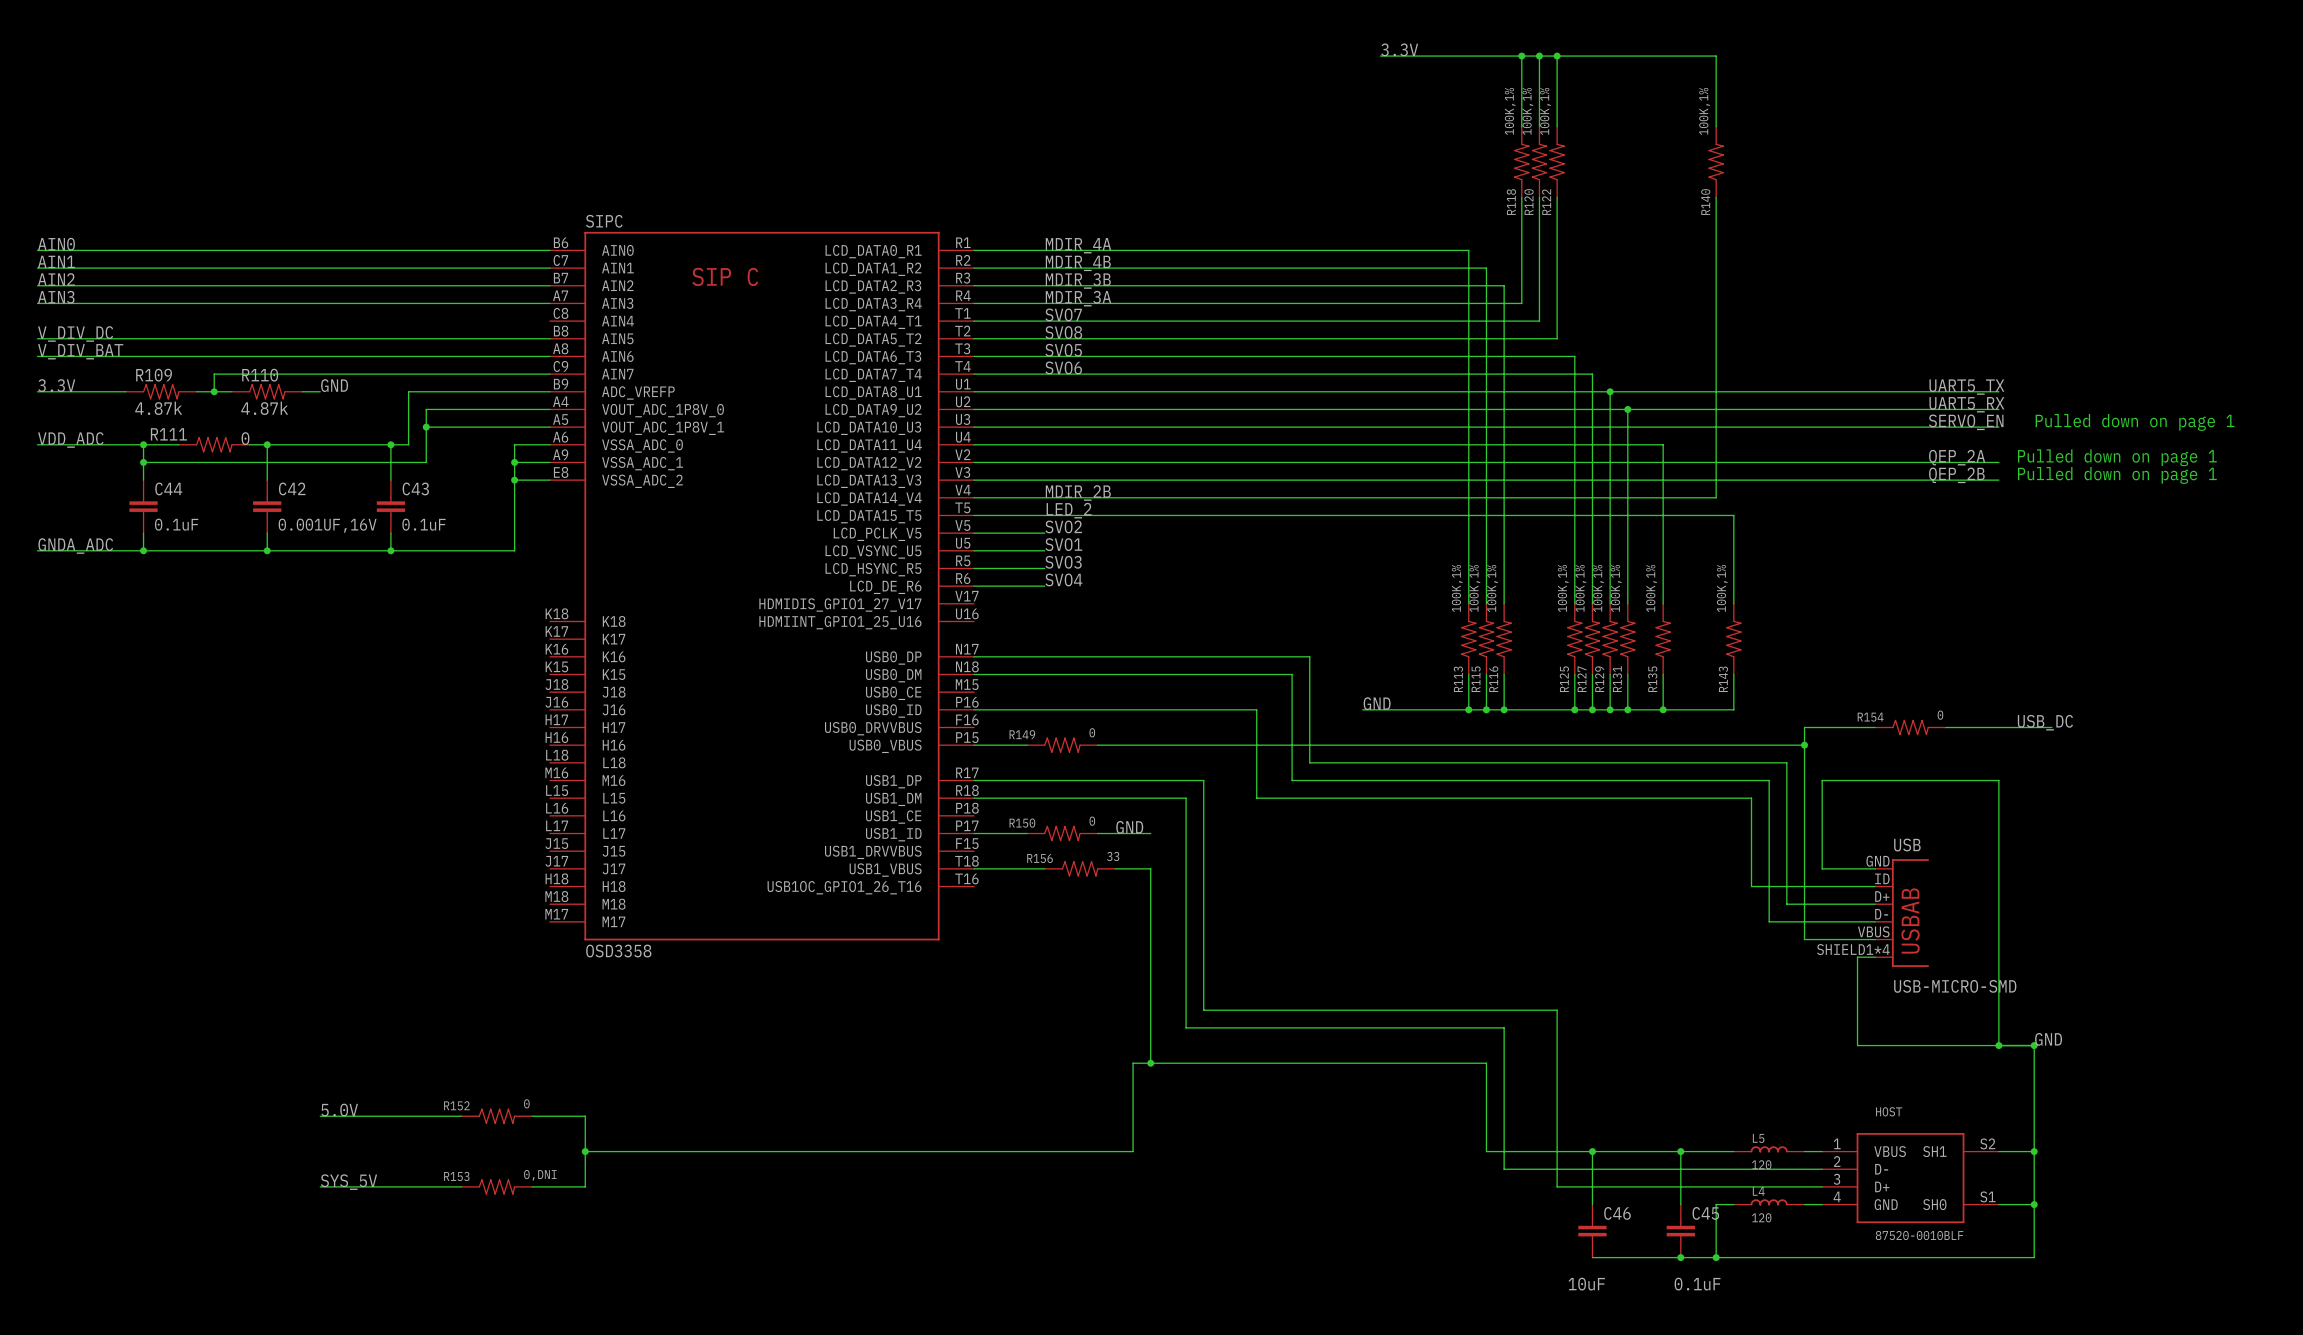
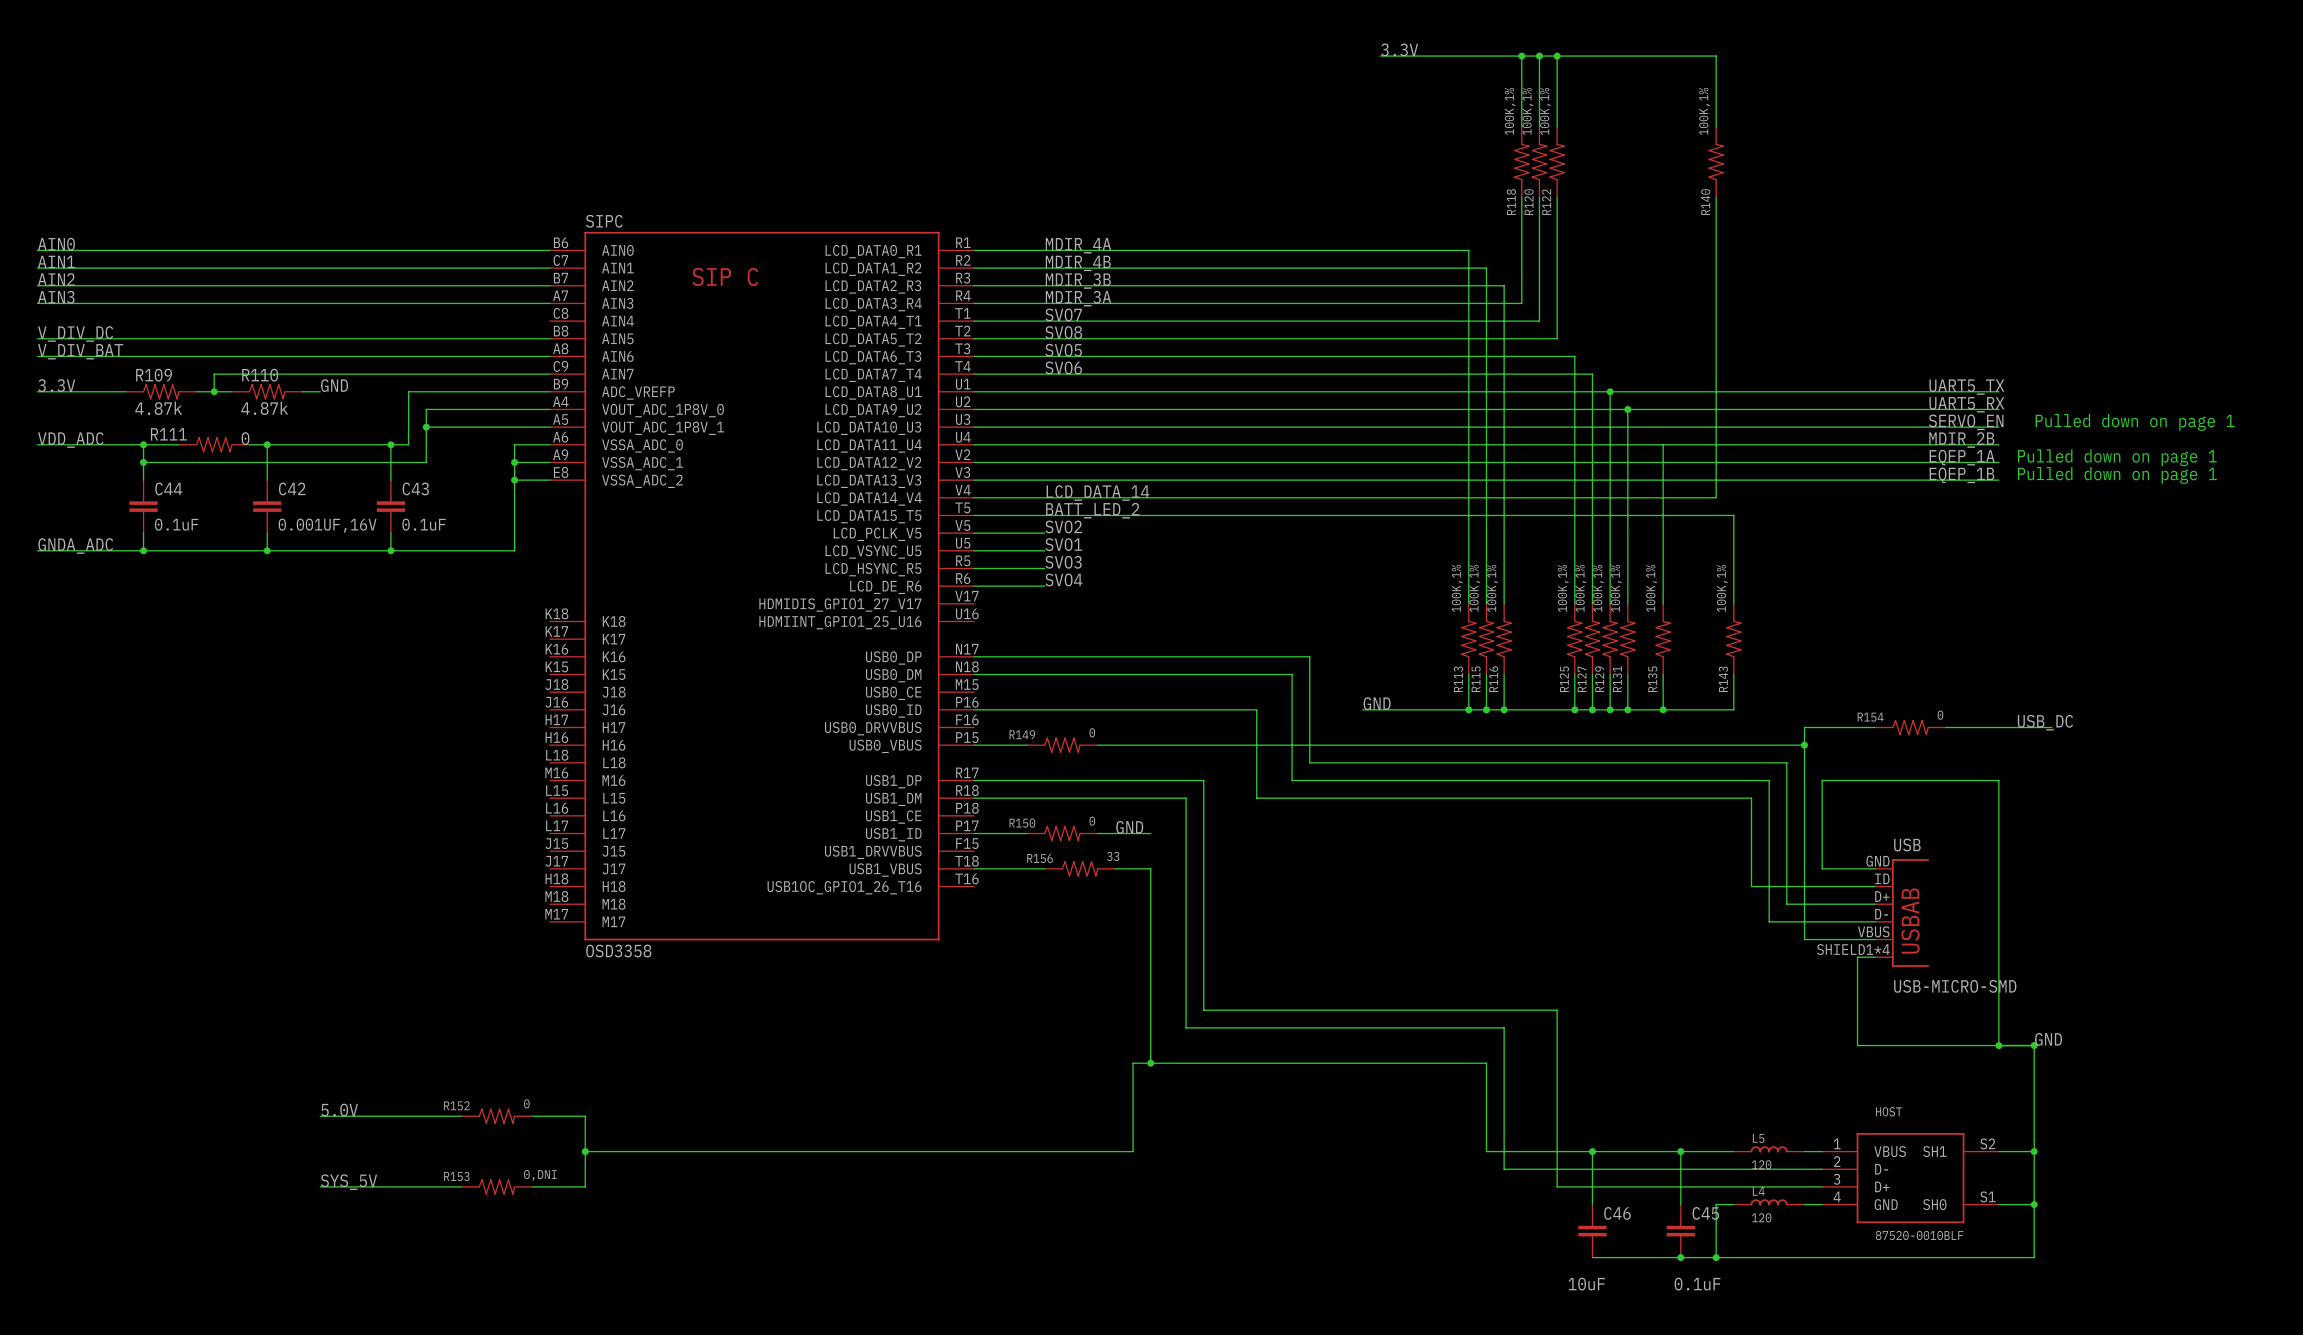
label: none -> MDIR_2B (1961, 439)
wire: none -> (1663, 444) (1998, 444)
label: QEP_2A (1957, 457) -> EQEP_1A (1962, 457)
label: QEP_2B (1956, 475) -> EQEP_1B (1961, 475)
label: MDIR_2B (1078, 493) -> LCD_DATA_14 (1097, 493)
label: LED_2 (1069, 510) -> BATT_LED_2 (1092, 510)

